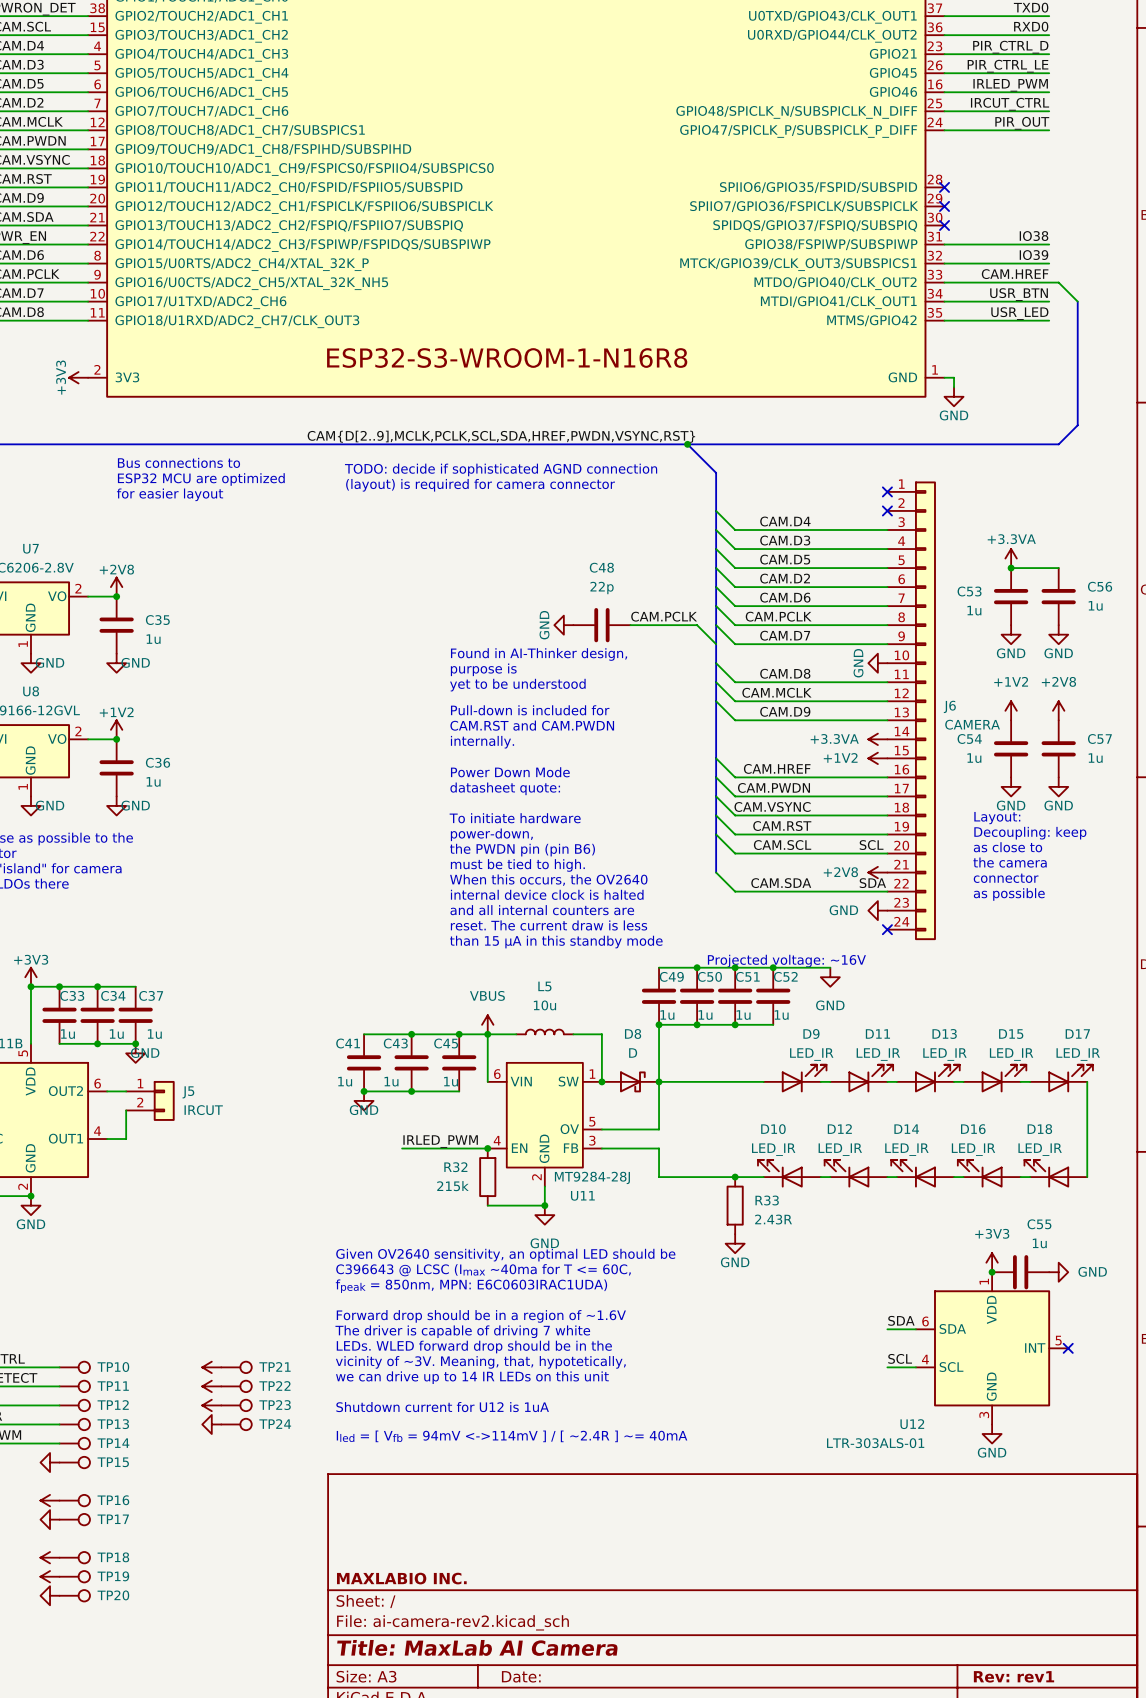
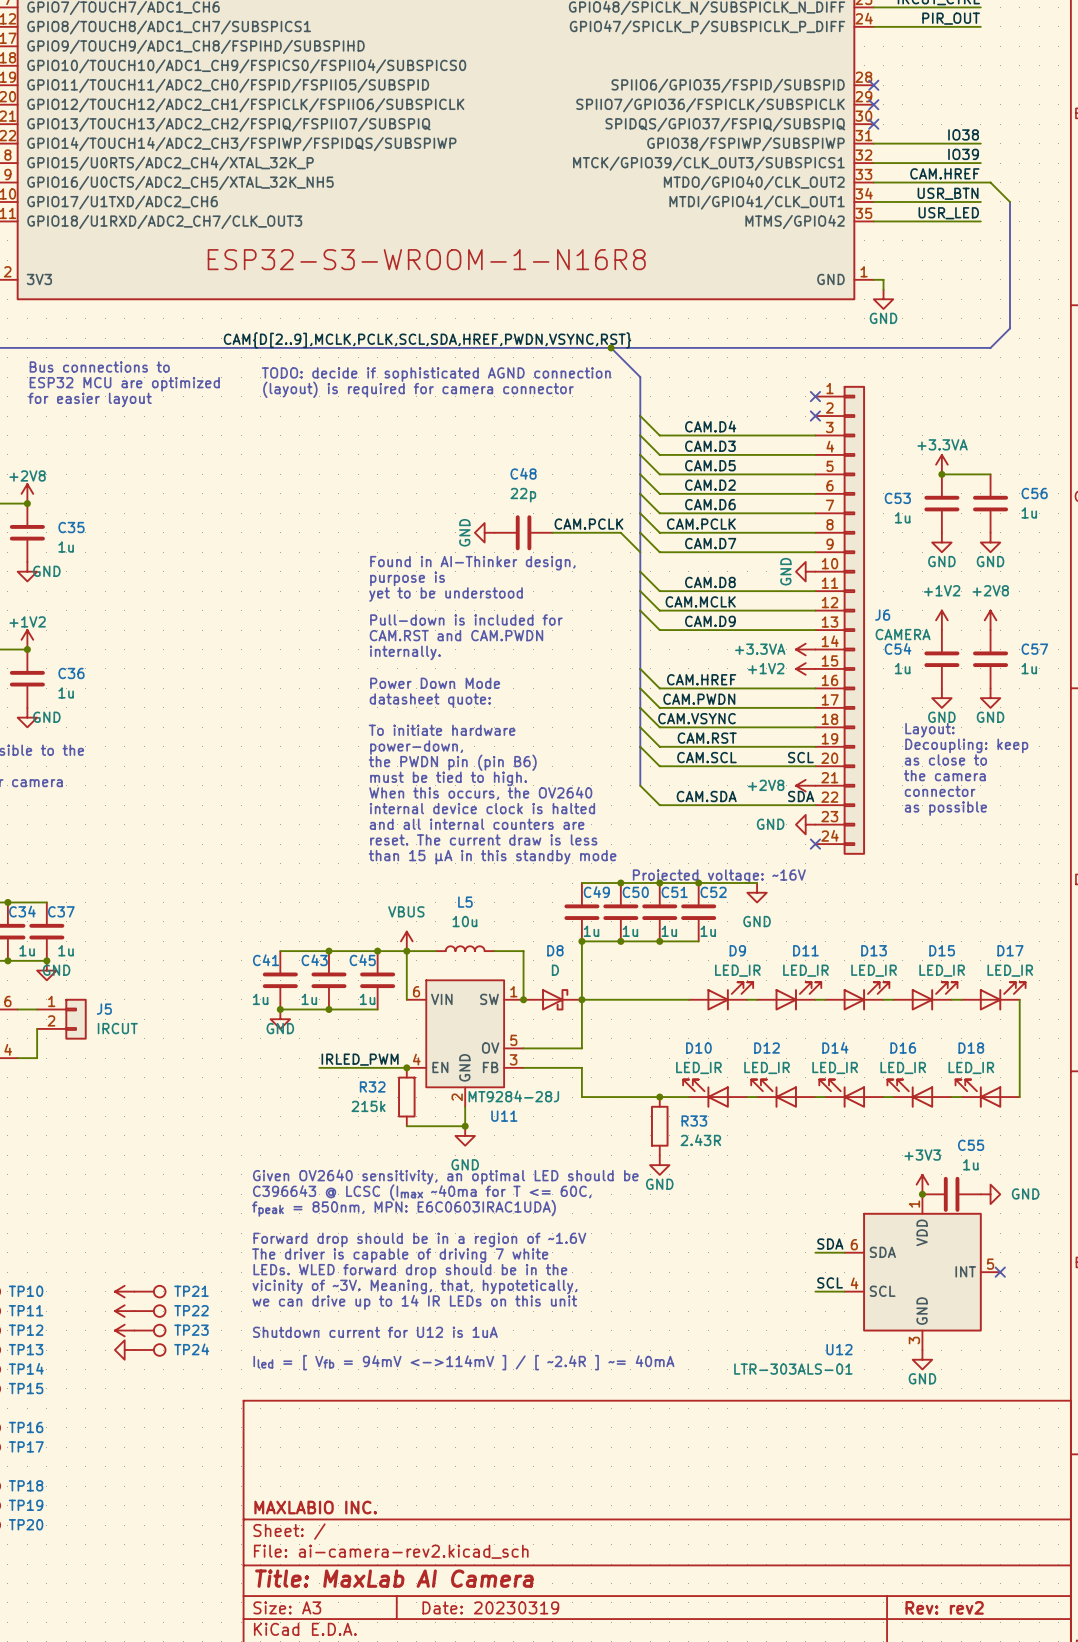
title block: Date: (521, 1676) -> Date: 20230319 (490, 1607)
title block: Rev: rev1 (1014, 1676) -> Rev: rev2 (944, 1607)

